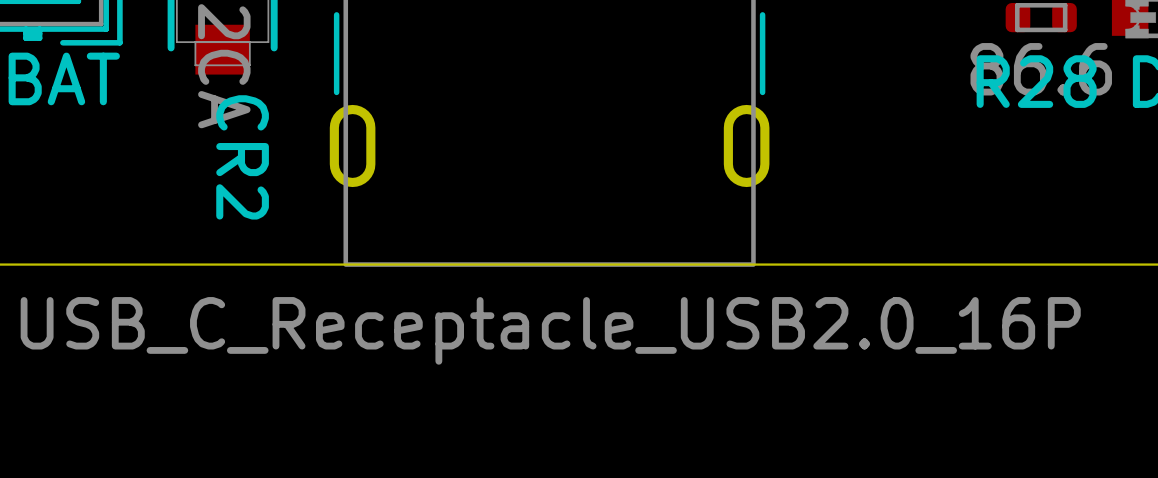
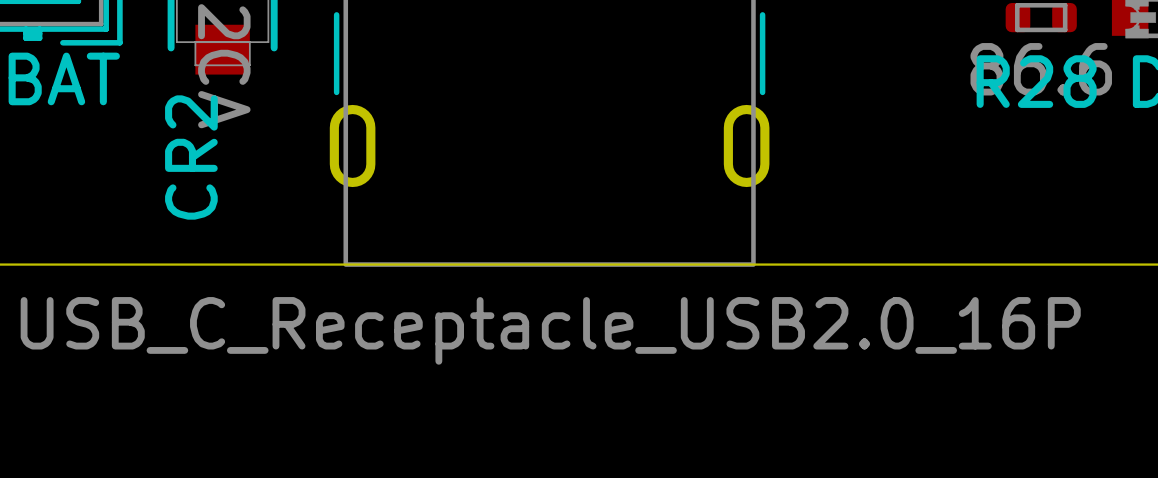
CR2 name rotation: 0° (242, 157) -> 180° (191, 157)

